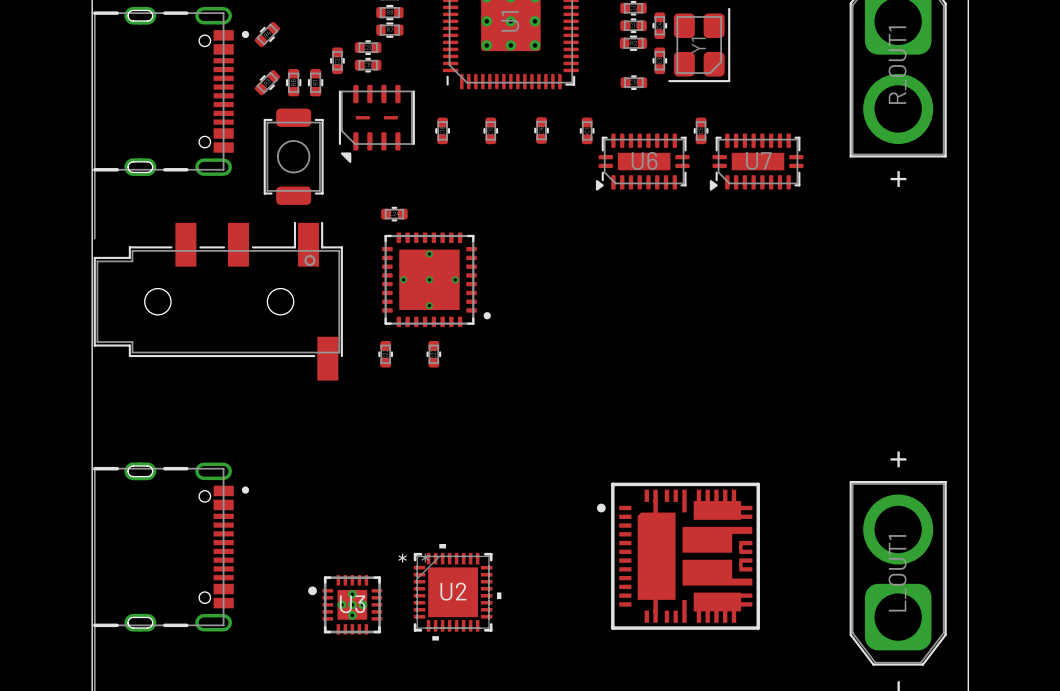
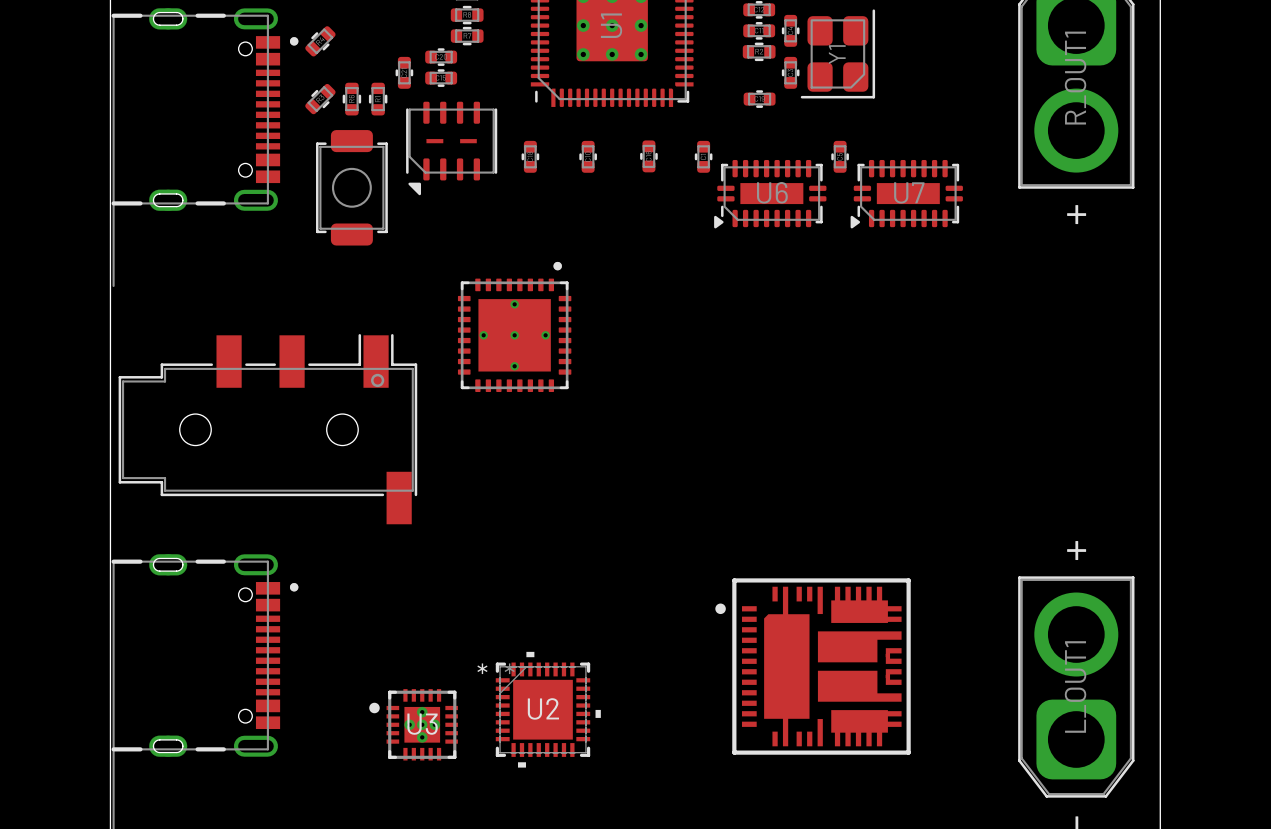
part: (394, 214) -> none
part rotation: 0° (436, 279) -> 90° counterclockwise (514, 326)
part position: (218, 301) -> (267, 429)
part: (385, 354) -> none
part: (433, 354) -> none

